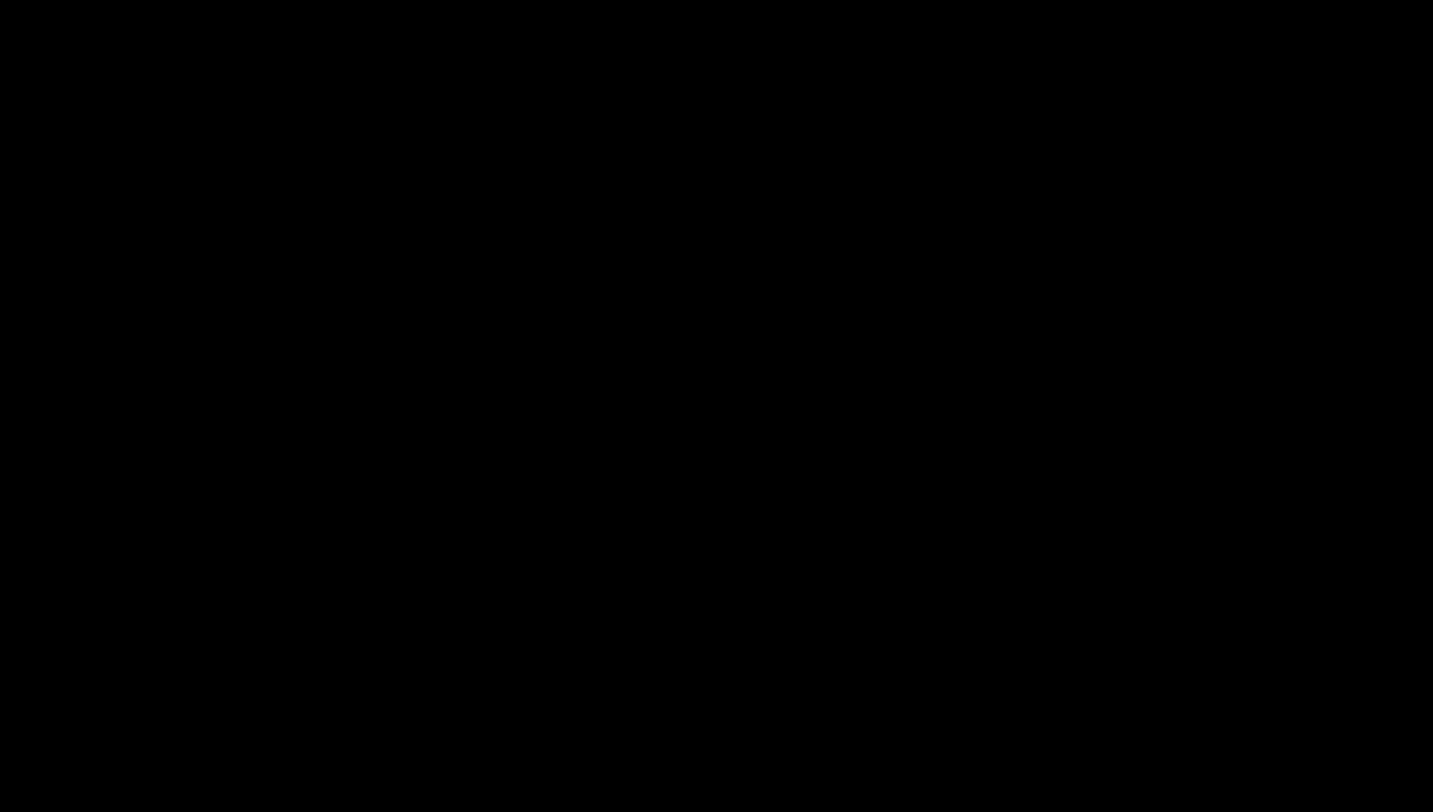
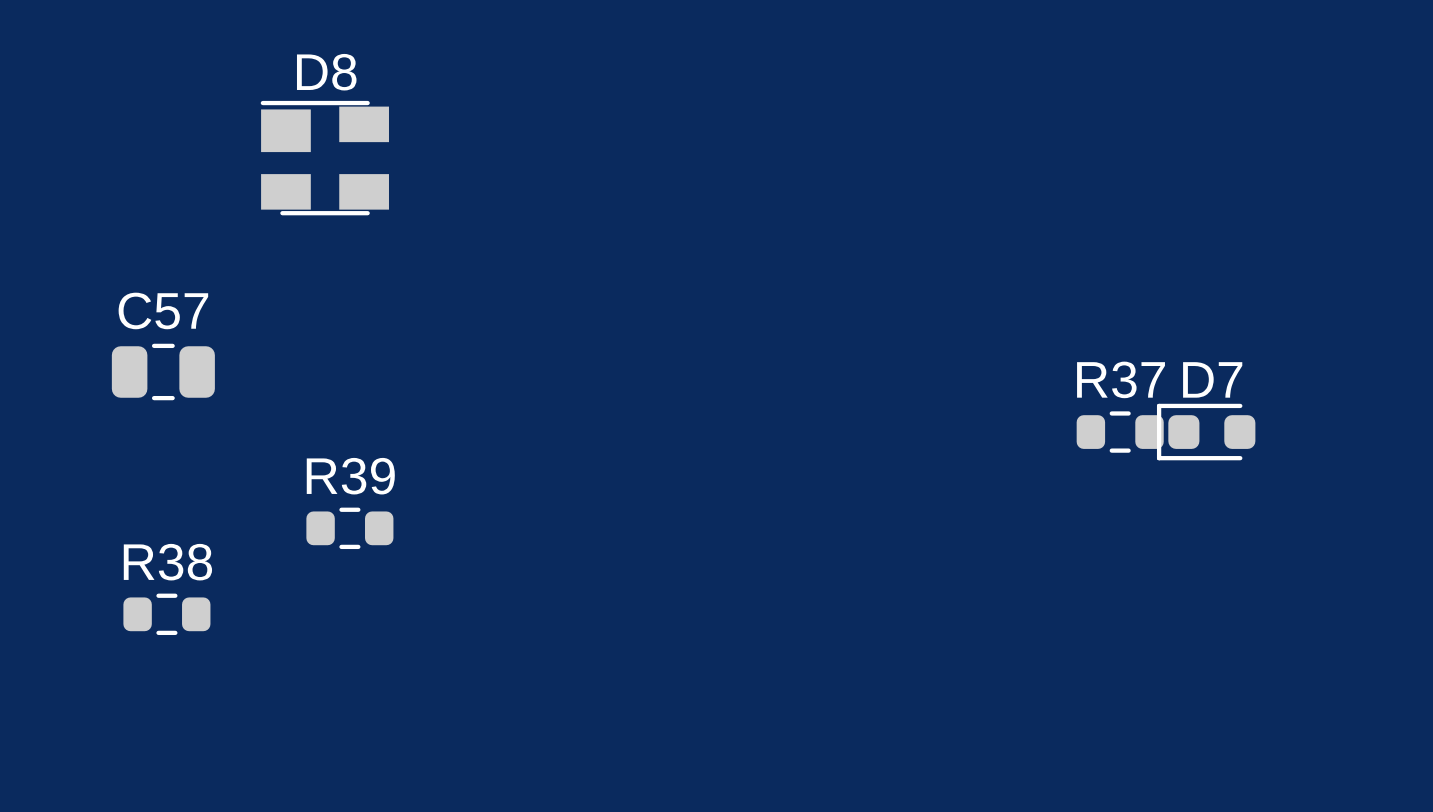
D8: none -> (324, 158)
C57: none -> (163, 372)
R37: none -> (1120, 432)
D7: none -> (1206, 432)
R39: none -> (349, 528)
R38: none -> (166, 614)

